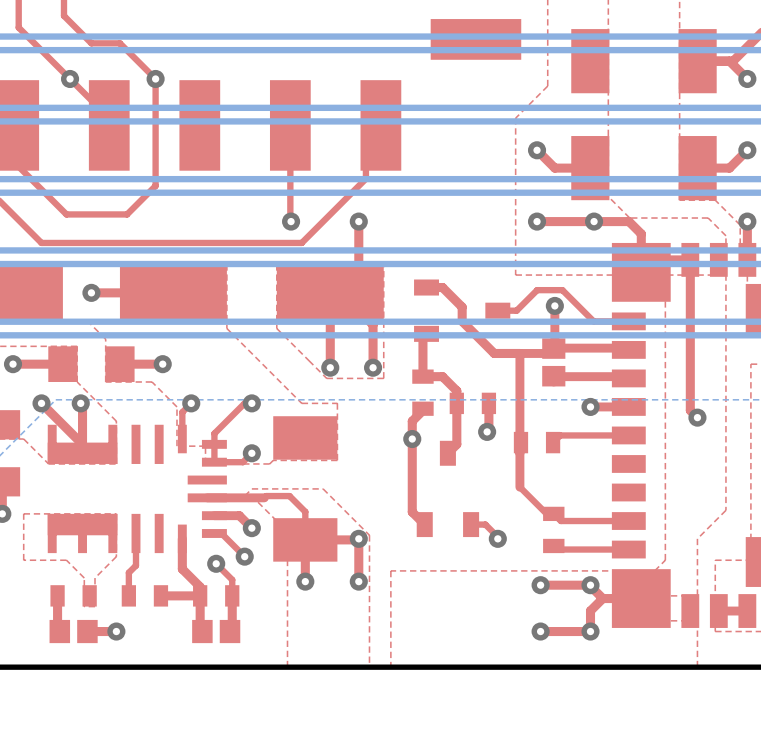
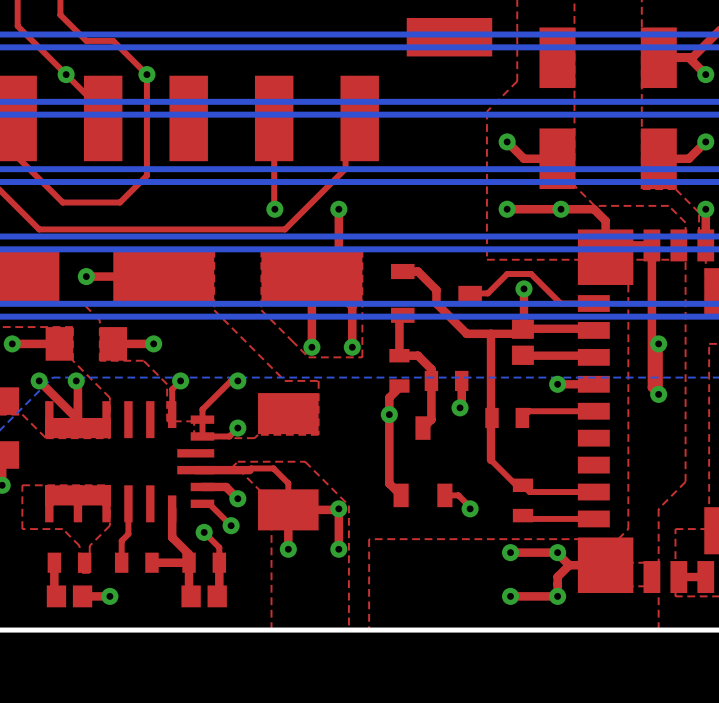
top track: none -> (658, 343) (658, 394)
via: none -> (658, 343)

